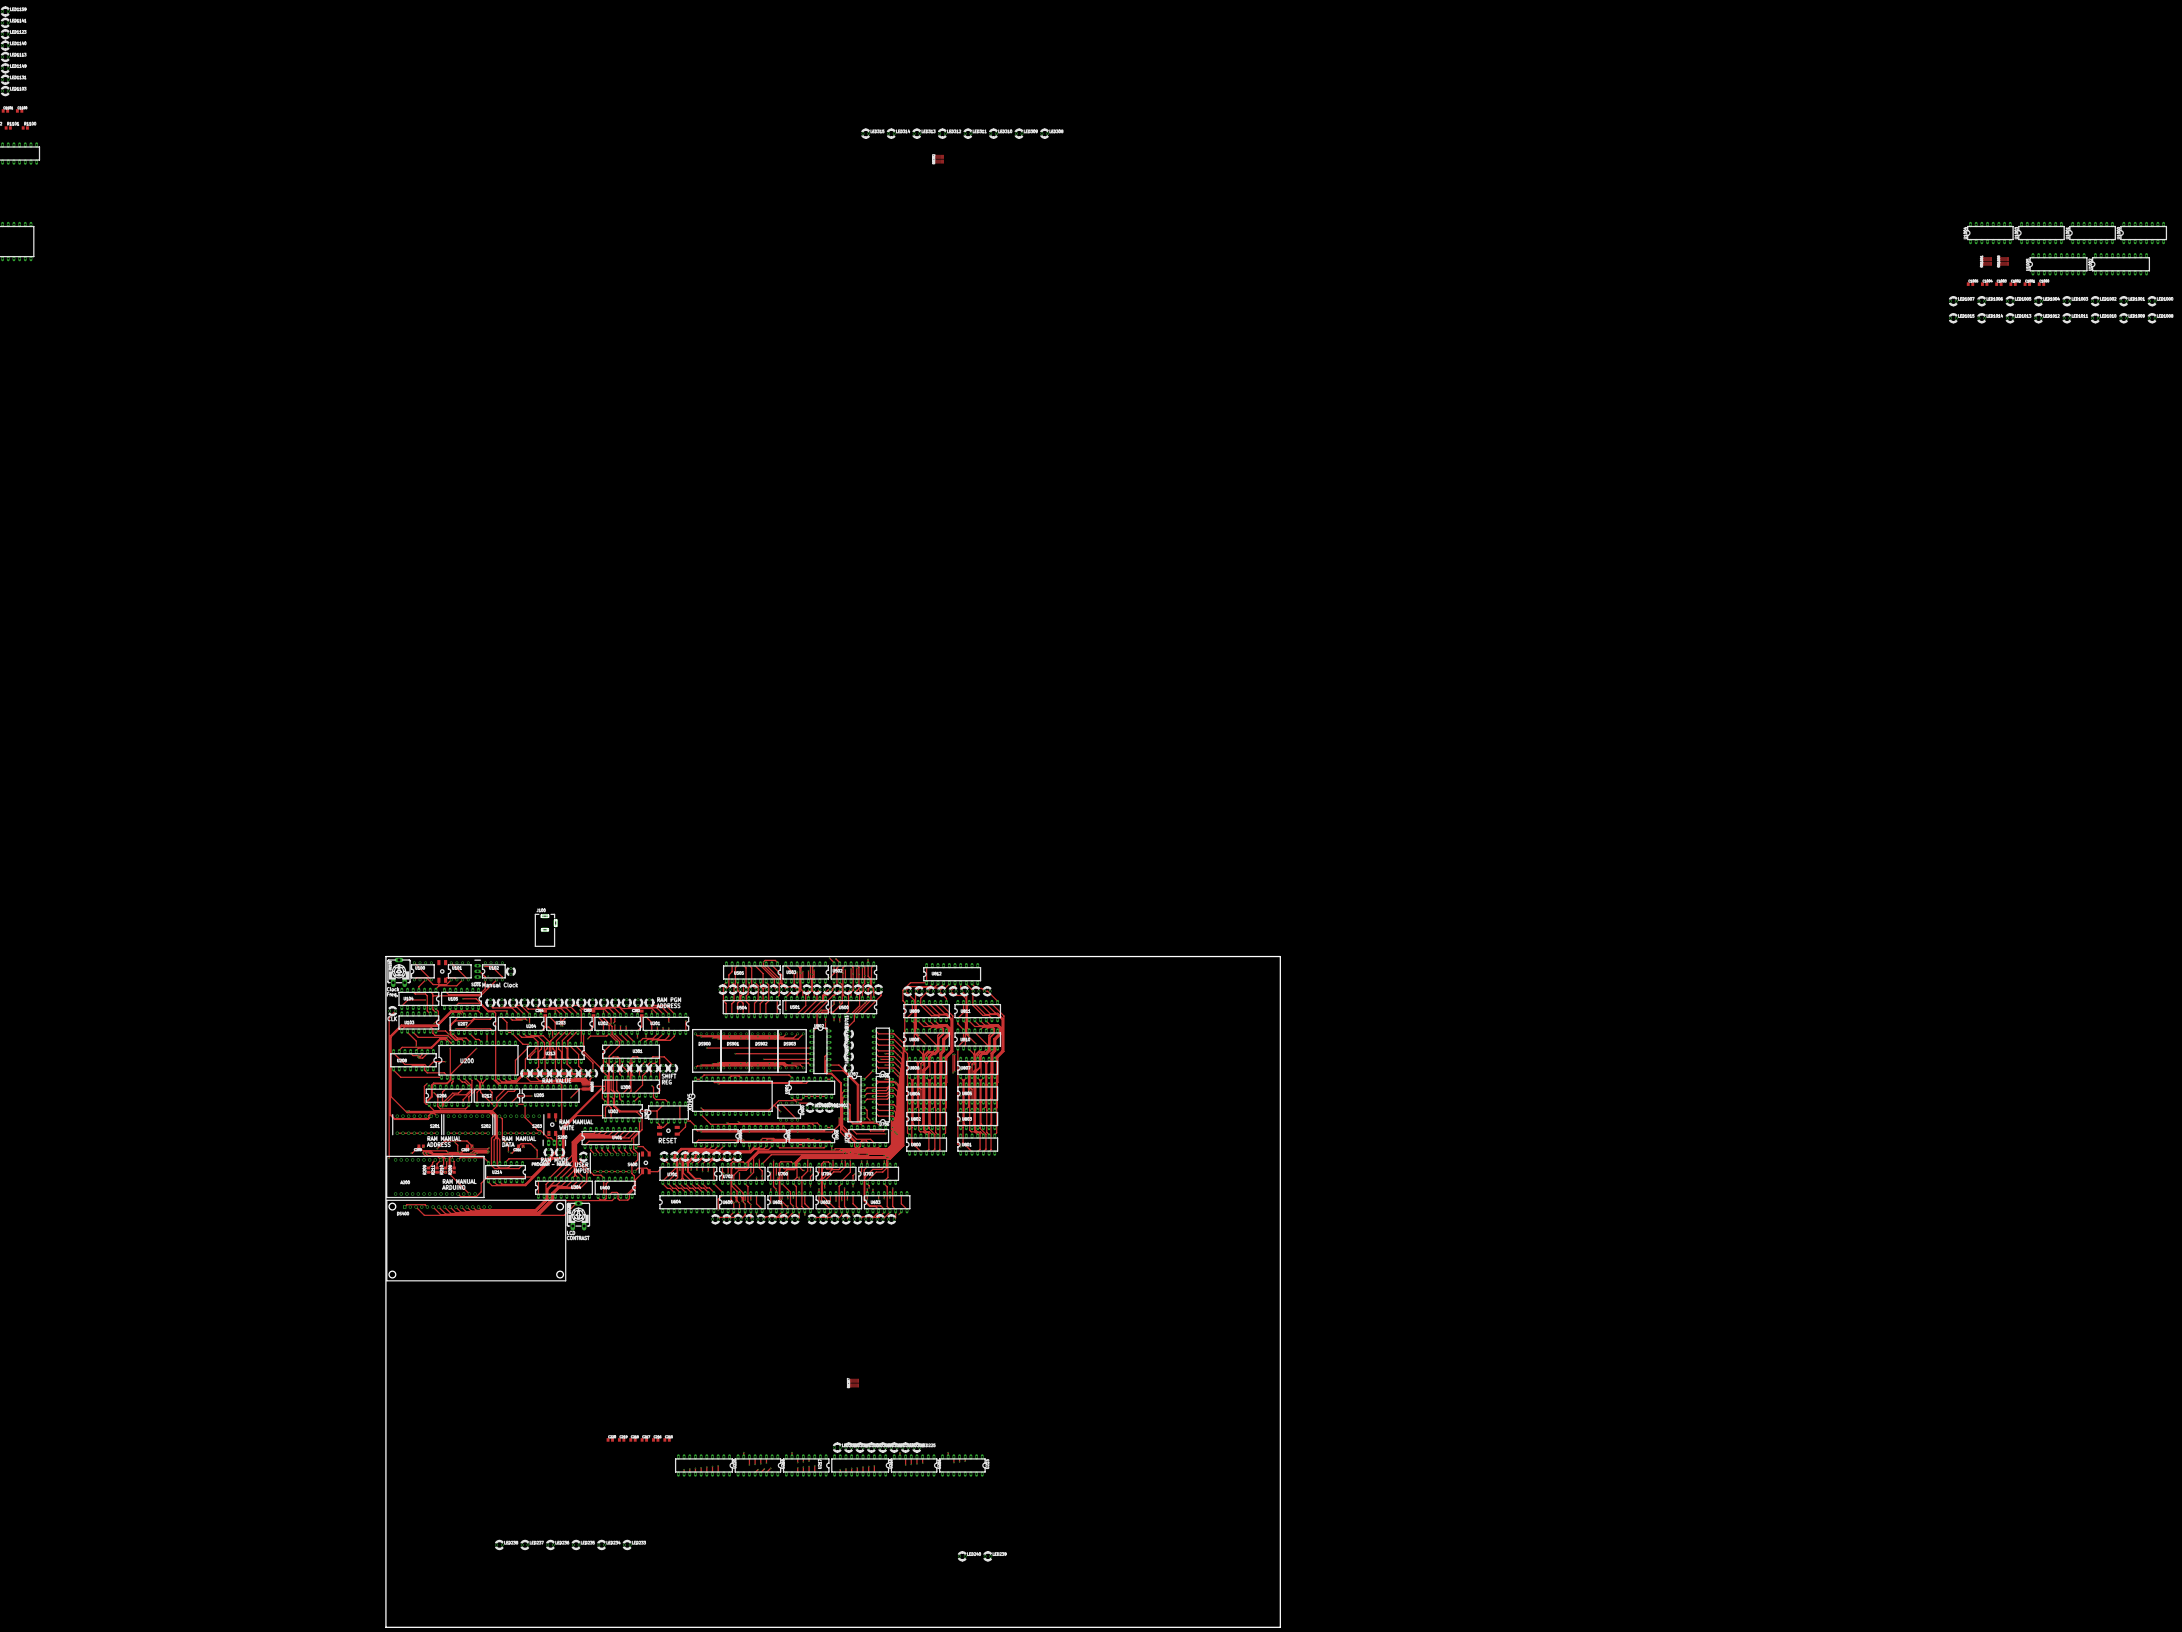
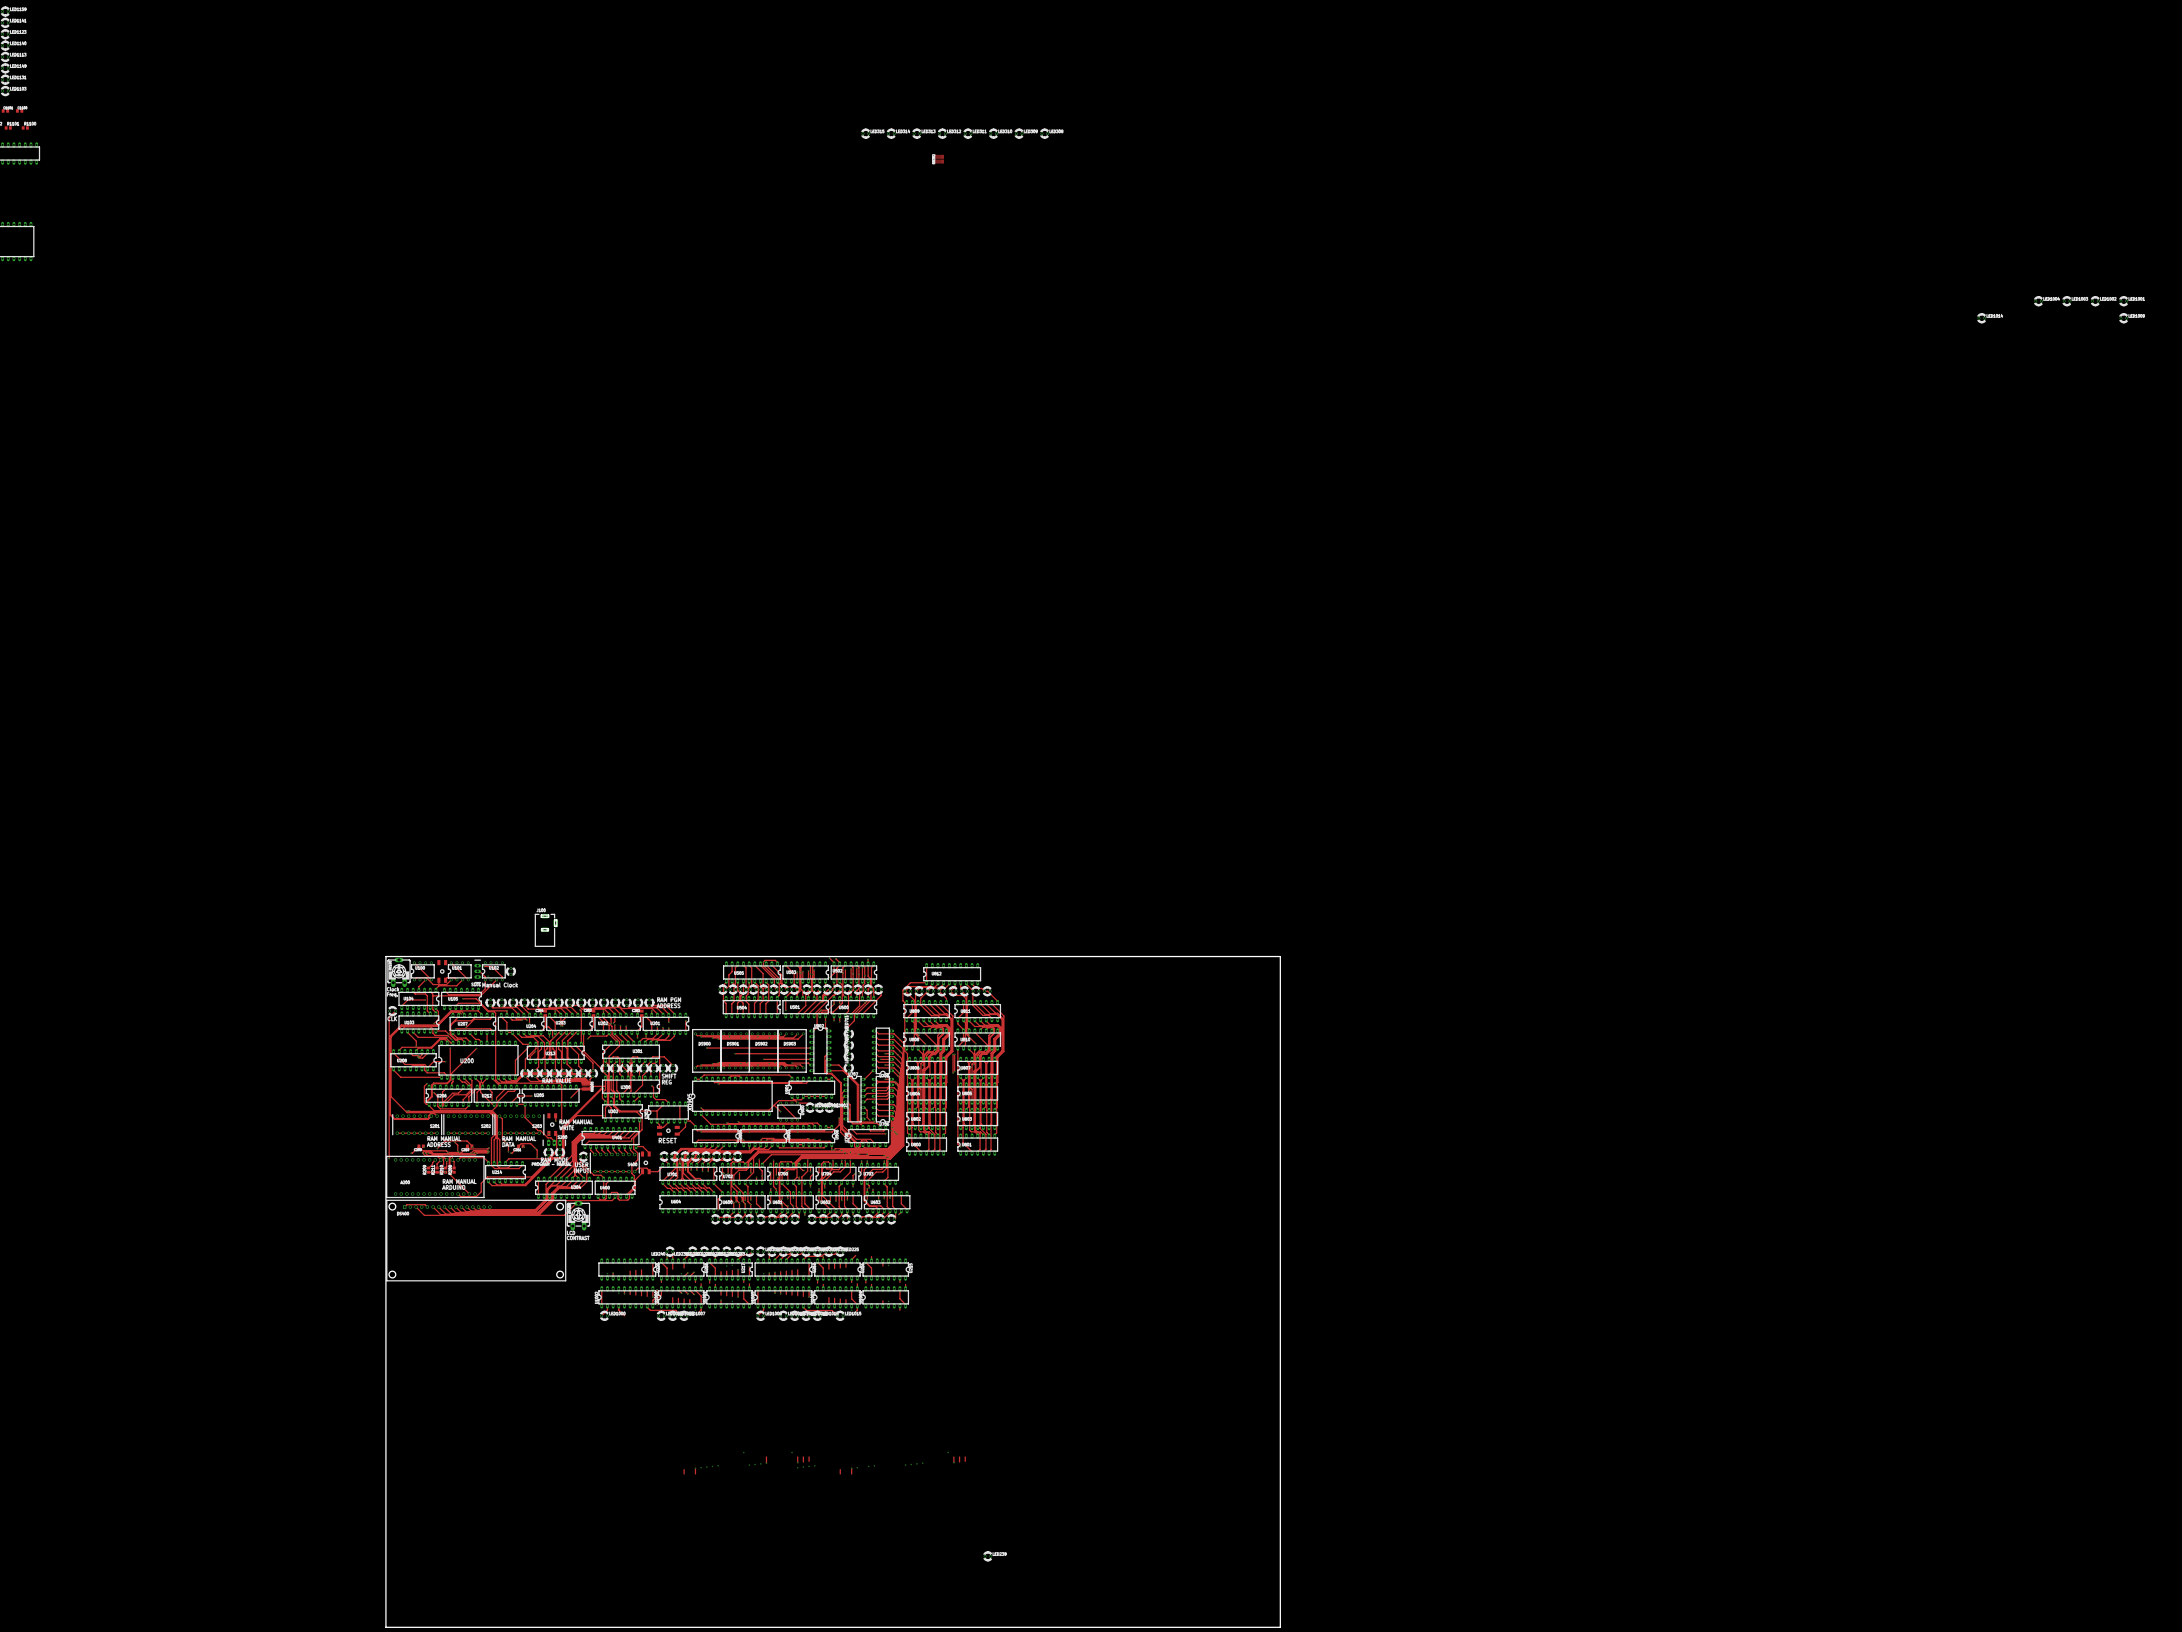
part position: (1990, 233) -> (885, 1297)
part position: (2041, 233) -> (837, 1297)
part position: (2092, 233) -> (729, 1297)
part position: (2143, 233) -> (681, 1297)
part: (1987, 261) -> none
part: (2004, 261) -> none
part position: (2058, 264) -> (783, 1297)
part position: (2121, 264) -> (627, 1297)
part: (1970, 284) -> none
part: (1984, 284) -> none
part: (1998, 284) -> none
part: (2013, 284) -> none
part: (2027, 284) -> none
part: (2041, 284) -> none
part position: (1953, 301) -> (684, 1315)
part position: (1981, 301) -> (672, 1315)
part position: (2010, 301) -> (661, 1315)
part position: (2152, 301) -> (604, 1315)
part position: (1953, 318) -> (840, 1315)
part position: (2010, 318) -> (817, 1315)
part position: (2038, 318) -> (806, 1315)
part position: (2067, 318) -> (794, 1315)
part position: (2095, 318) -> (783, 1315)
part position: (2152, 318) -> (760, 1315)
track: none -> (672, 1251) (672, 1269)
track: none -> (695, 1251) (684, 1259) (684, 1267)
track: none -> (752, 1251) (748, 1254) (742, 1254) (738, 1261)
track: none -> (769, 1251) (769, 1261)
track: none -> (780, 1251) (774, 1261)
track: none -> (792, 1251) (785, 1254) (780, 1261)
track: none -> (803, 1251) (800, 1254) (791, 1254) (786, 1261)
track: none -> (837, 1251) (834, 1254) (806, 1256) (803, 1261)
track: none -> (855, 1255) (851, 1261)
track: none -> (667, 1256) (667, 1261)
via: none -> (667, 1256)
track: none -> (715, 1256) (715, 1261)
track: none -> (823, 1256) (823, 1261)
via: none -> (823, 1256)
track: none -> (871, 1256) (871, 1261)
track: none -> (652, 1261) (652, 1278)
track: none -> (661, 1261) (667, 1268) (667, 1278)
track: none -> (709, 1261) (715, 1268) (715, 1278)
track: none -> (809, 1261) (809, 1278)
track: none -> (817, 1261) (823, 1268) (823, 1278)
track: none -> (828, 1261) (828, 1269)
track: none -> (834, 1261) (834, 1268)
track: none -> (840, 1261) (840, 1267)
track: none -> (845, 1261) (845, 1267)
track: none -> (865, 1261) (871, 1268) (871, 1278)
track: none -> (882, 1261) (882, 1266)
via: none -> (732, 1265)
via: none -> (888, 1265)
via: none -> (726, 1266)
track: none -> (749, 1266) (749, 1278)
via: none -> (749, 1266)
track: none -> (641, 1269) (641, 1278)
track: none -> (738, 1269) (738, 1278)
via: none -> (738, 1269)
track: none -> (797, 1269) (797, 1278)
track: none -> (635, 1270) (635, 1278)
track: none -> (732, 1270) (732, 1278)
track: none -> (792, 1270) (792, 1278)
track: none -> (630, 1271) (630, 1278)
track: none -> (721, 1271) (721, 1278)
track: none -> (726, 1271) (726, 1278)
track: none -> (780, 1271) (780, 1278)
track: none -> (786, 1271) (786, 1278)
track: none -> (613, 1272) (613, 1278)
via: none -> (613, 1272)
track: none -> (687, 1272) (684, 1278)
via: none -> (687, 1272)
track: none -> (694, 1272) (689, 1278)
via: none -> (694, 1272)
track: none -> (769, 1272) (769, 1278)
via: none -> (769, 1272)
track: none -> (774, 1272) (774, 1278)
via: none -> (774, 1272)
via: none -> (607, 1273)
via: none -> (681, 1273)
via: none -> (763, 1273)
track: none -> (661, 1278) (661, 1282)
track: none -> (695, 1278) (695, 1282)
track: none -> (709, 1278) (709, 1283)
track: none -> (743, 1278) (743, 1282)
track: none -> (817, 1278) (817, 1283)
track: none -> (851, 1278) (851, 1282)
track: none -> (865, 1278) (865, 1283)
track: none -> (899, 1278) (899, 1282)
track: none -> (701, 1283) (701, 1288)
track: none -> (749, 1283) (749, 1288)
track: none -> (857, 1283) (857, 1288)
track: none -> (715, 1284) (715, 1288)
track: none -> (823, 1284) (823, 1288)
track: none -> (871, 1284) (871, 1288)
track: none -> (905, 1284) (905, 1288)
track: none -> (601, 1288) (601, 1305)
track: none -> (624, 1288) (624, 1293)
track: none -> (630, 1288) (630, 1294)
track: none -> (635, 1288) (635, 1295)
track: none -> (641, 1288) (641, 1295)
track: none -> (647, 1288) (647, 1296)
track: none -> (652, 1288) (652, 1297)
track: none -> (661, 1288) (661, 1294) (657, 1299) (657, 1304)
track: none -> (678, 1288) (681, 1293)
track: none -> (684, 1288) (687, 1293)
track: none -> (689, 1288) (694, 1294)
track: none -> (695, 1288) (701, 1295) (701, 1310) (699, 1311)
track: none -> (721, 1288) (721, 1295)
track: none -> (726, 1288) (726, 1295)
track: none -> (732, 1288) (732, 1296)
track: none -> (738, 1288) (738, 1297)
track: none -> (743, 1288) (743, 1298) (749, 1305)
track: none -> (757, 1288) (757, 1305)
track: none -> (774, 1288) (774, 1293)
track: none -> (780, 1288) (780, 1293)
track: none -> (786, 1288) (786, 1294)
track: none -> (792, 1288) (792, 1295)
track: none -> (797, 1288) (797, 1295)
track: none -> (803, 1288) (803, 1296)
track: none -> (809, 1288) (809, 1297)
track: none -> (851, 1288) (851, 1298) (857, 1304) (855, 1311)
track: none -> (899, 1288) (899, 1298) (905, 1305)
track: none -> (657, 1289) (657, 1295) (652, 1300) (652, 1305)
via: none -> (657, 1289)
via: none -> (618, 1293)
via: none -> (624, 1293)
via: none -> (681, 1293)
via: none -> (687, 1293)
via: none -> (774, 1293)
via: none -> (780, 1293)
via: none -> (694, 1294)
via: none -> (652, 1297)
track: none -> (672, 1297) (672, 1305)
track: none -> (828, 1297) (828, 1305)
track: none -> (678, 1298) (678, 1305)
track: none -> (684, 1298) (684, 1305)
track: none -> (834, 1298) (834, 1305)
track: none -> (840, 1298) (840, 1305)
track: none -> (689, 1299) (689, 1305)
track: none -> (845, 1299) (845, 1305)
track: none -> (721, 1300) (721, 1305)
via: none -> (721, 1300)
track: none -> (882, 1300) (882, 1305)
via: none -> (732, 1301)
via: none -> (888, 1301)
via: none -> (657, 1304)
track: none -> (607, 1305) (607, 1310) (601, 1315)
track: none -> (618, 1305) (618, 1310) (624, 1315)
track: none -> (647, 1305) (650, 1310) (675, 1310) (681, 1315)
track: none -> (763, 1305) (763, 1310) (757, 1315)
track: none -> (803, 1305) (806, 1310) (832, 1310) (837, 1315)
track: none -> (899, 1305) (899, 1310)
via: none -> (695, 1310)
via: none -> (851, 1310)
part: (854, 1383) -> none
part: (610, 1439) -> none
part: (621, 1439) -> none
part: (632, 1439) -> none
part: (644, 1439) -> none
part: (655, 1439) -> none
part: (667, 1439) -> none
part position: (837, 1447) -> (760, 1251)
part position: (848, 1447) -> (772, 1251)
part position: (860, 1447) -> (783, 1251)
part position: (871, 1447) -> (794, 1251)
part position: (882, 1447) -> (806, 1251)
part position: (894, 1447) -> (817, 1251)
part position: (905, 1447) -> (828, 1251)
part position: (916, 1447) -> (840, 1251)
track: (743, 1452) (743, 1456) -> none
track: (792, 1452) (792, 1456) -> none
track: (899, 1452) (899, 1456) -> none
via: (899, 1452) -> none
track: (948, 1452) (948, 1456) -> none
track: (749, 1456) (749, 1465) -> none
track: (755, 1456) (755, 1464) -> none
track: (760, 1456) (760, 1463) -> none
track: (905, 1456) (905, 1465) -> none
track: (911, 1456) (911, 1464) -> none
track: (916, 1456) (916, 1463) -> none
track: (922, 1456) (922, 1463) -> none
via: (803, 1461) -> none
via: (809, 1461) -> none
via: (959, 1461) -> none
via: (965, 1461) -> none
part position: (703, 1465) -> (627, 1269)
track: (718, 1465) (718, 1473) -> none
part position: (757, 1465) -> (681, 1269)
part position: (806, 1465) -> (729, 1269)
track: (814, 1465) (814, 1473) -> none
part position: (860, 1465) -> (783, 1269)
track: (874, 1465) (874, 1473) -> none
part position: (914, 1465) -> (837, 1269)
part position: (962, 1465) -> (885, 1269)
track: (712, 1466) (712, 1473) -> none
track: (809, 1466) (809, 1473) -> none
track: (868, 1466) (868, 1473) -> none
track: (701, 1467) (701, 1473) -> none
track: (706, 1467) (706, 1473) -> none
track: (797, 1467) (797, 1473) -> none
track: (803, 1467) (803, 1473) -> none
track: (857, 1467) (857, 1473) -> none
track: (863, 1467) (863, 1473) -> none
track: (689, 1468) (689, 1473) -> none
via: (689, 1468) -> none
track: (764, 1468) (760, 1473) -> none
via: (764, 1468) -> none
track: (770, 1468) (766, 1473) -> none
via: (770, 1468) -> none
track: (845, 1468) (845, 1473) -> none
via: (684, 1469) -> none
track: (758, 1469) (755, 1473) -> none
via: (758, 1469) -> none
via: (840, 1469) -> none
part rotation: 0° (499, 1544) -> 180° (692, 1251)
part position: (499, 1544) -> (692, 1251)
part rotation: 0° (525, 1544) -> 180° (704, 1251)
part position: (525, 1544) -> (704, 1251)
part rotation: 0° (550, 1544) -> 180° (715, 1251)
part position: (550, 1544) -> (715, 1251)
part rotation: 0° (576, 1544) -> 180° (726, 1251)
part position: (576, 1544) -> (726, 1251)
part rotation: 0° (601, 1544) -> 180° (738, 1251)
part position: (601, 1544) -> (738, 1251)
part rotation: 0° (627, 1544) -> 180° (749, 1251)
part position: (627, 1544) -> (749, 1251)
part rotation: 0° (962, 1556) -> 180° (669, 1251)
part position: (962, 1556) -> (669, 1251)

